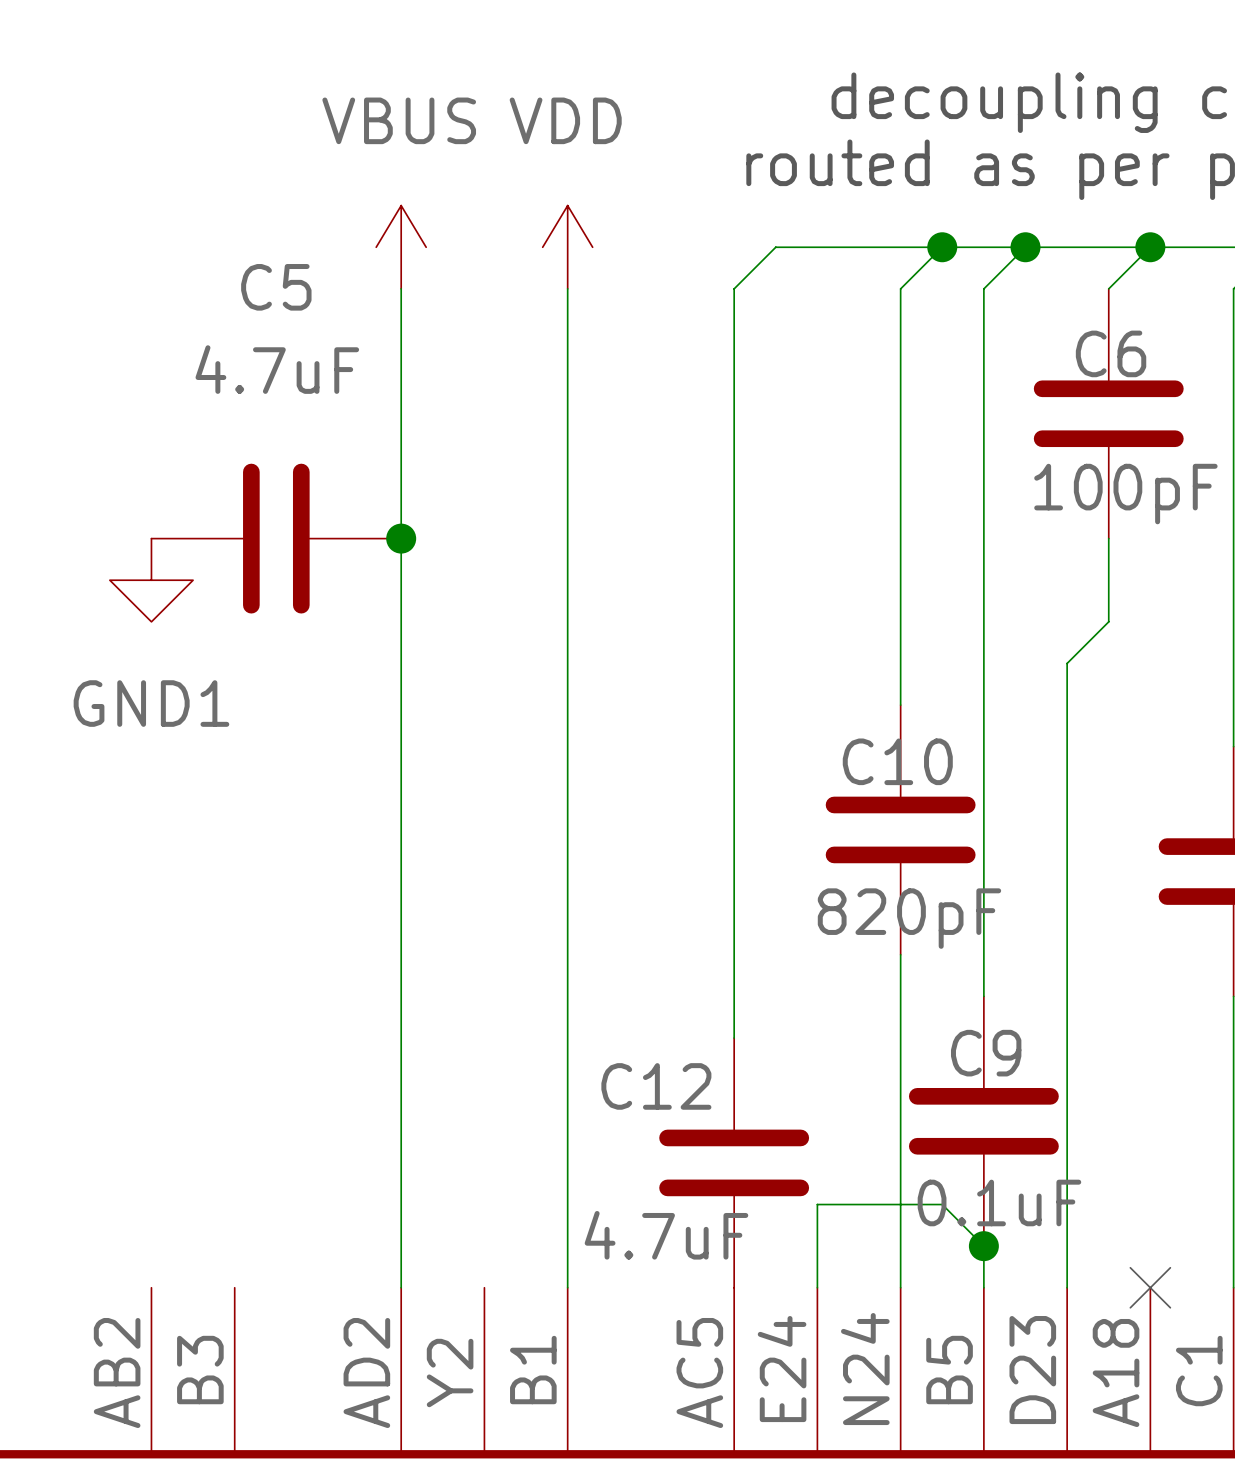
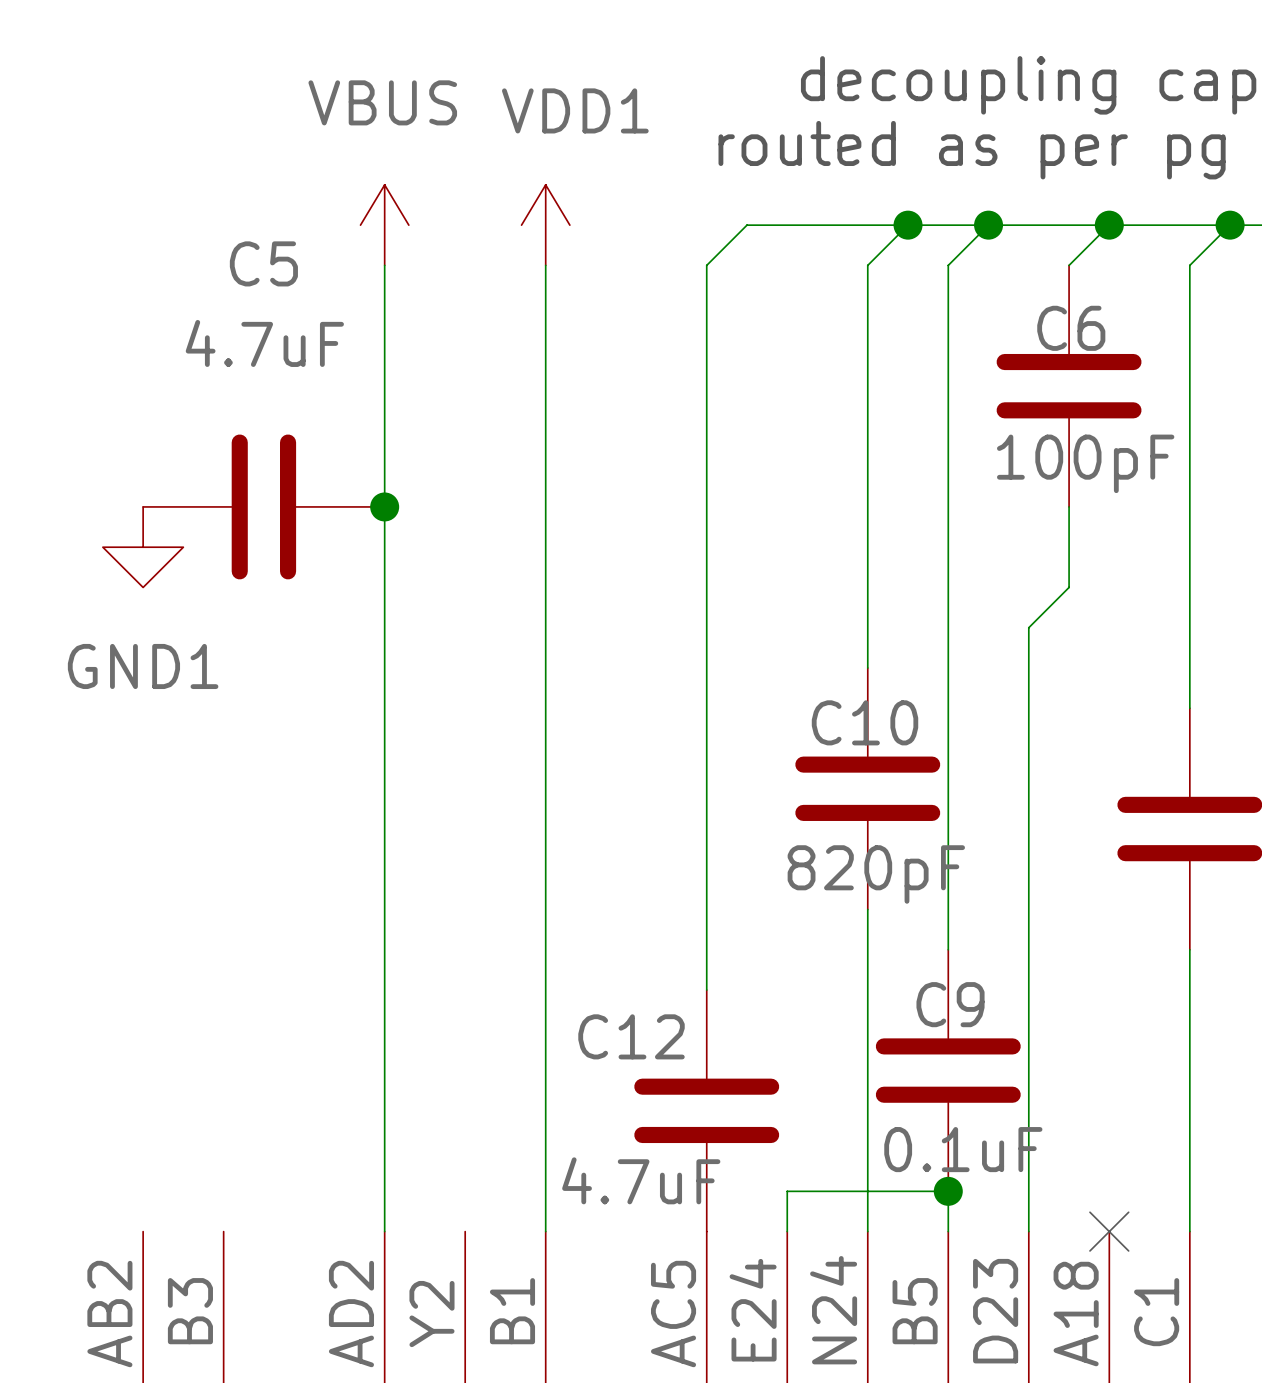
power symbol: VDD (567, 247) -> VDD1 (545, 225)
wire: (817, 1246) (817, 1204) (942, 1204) (983, 1246) -> (787, 1191) (948, 1191)

